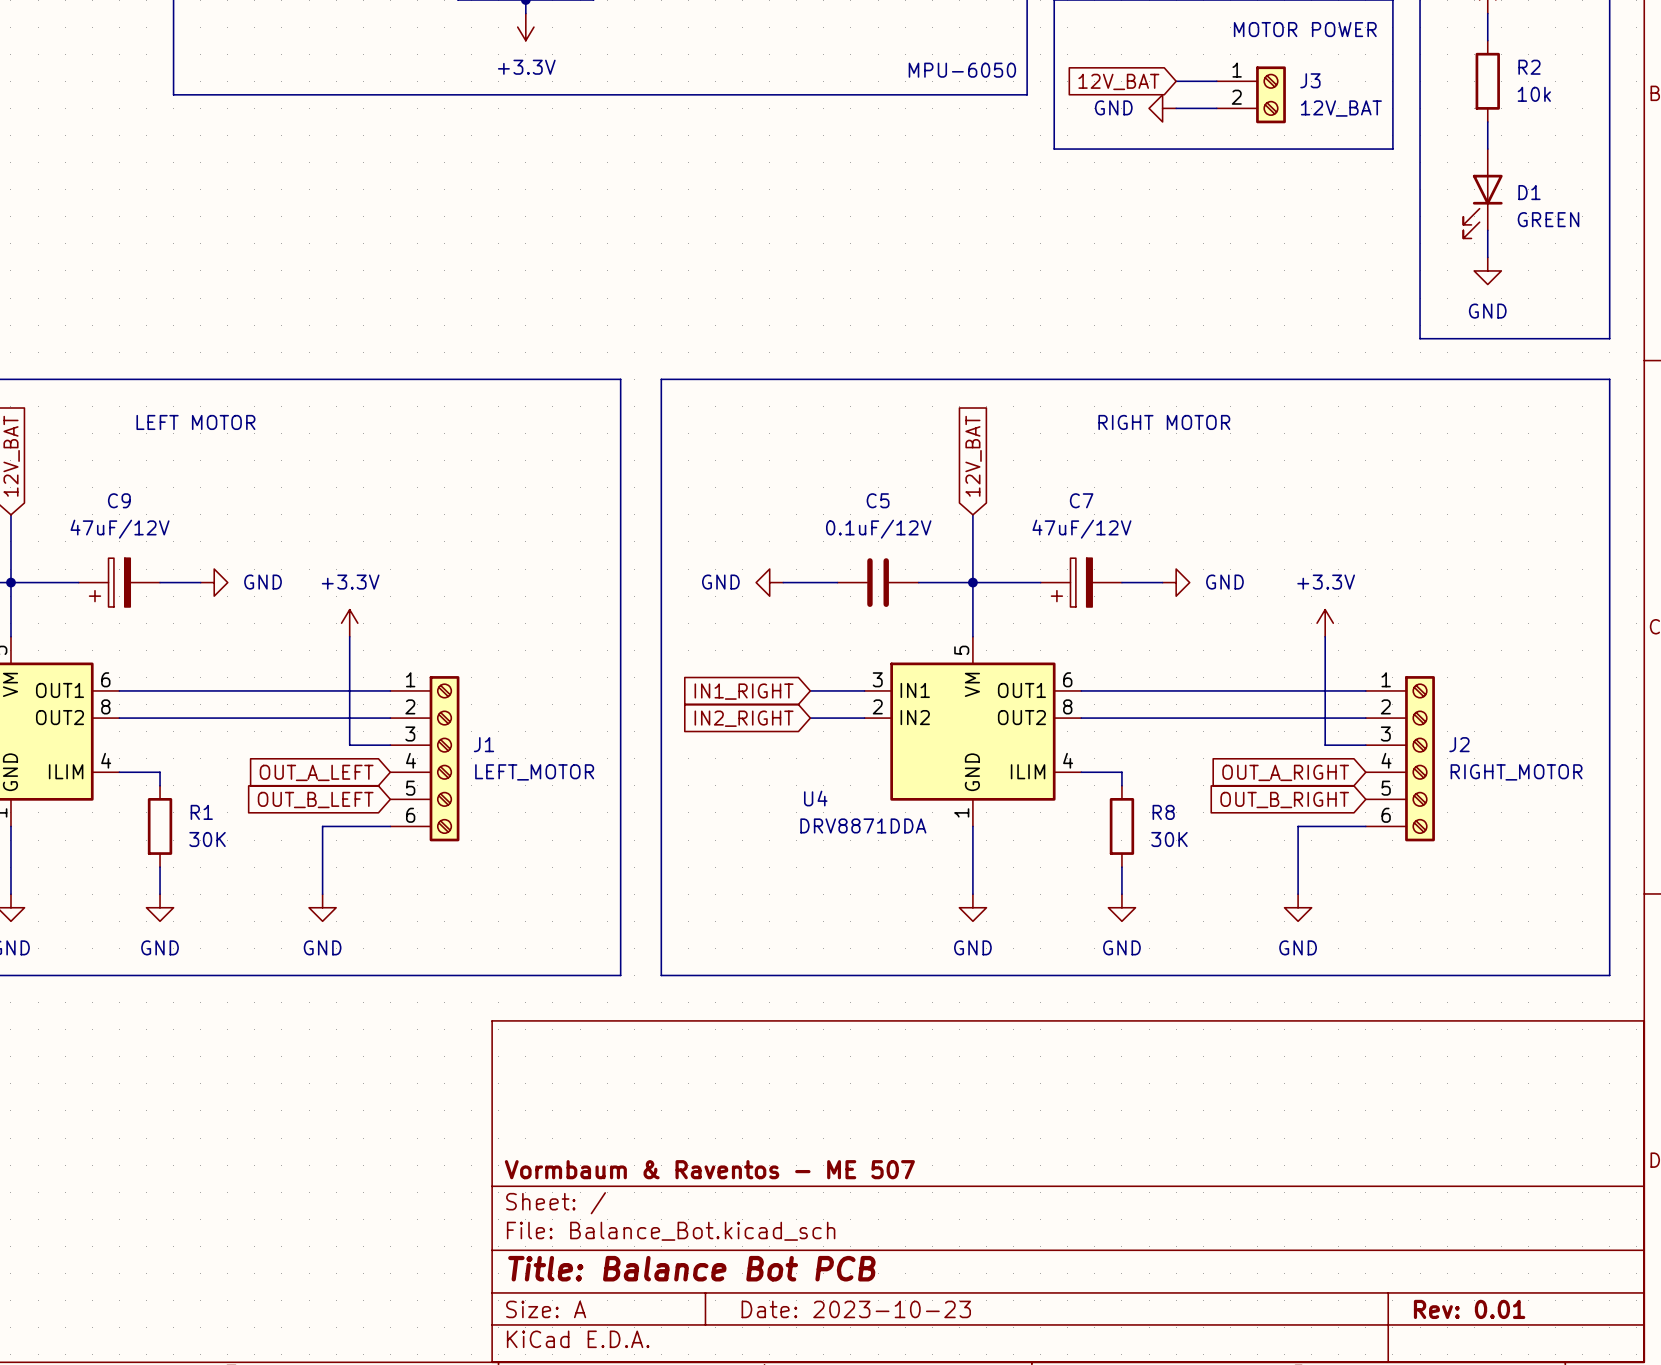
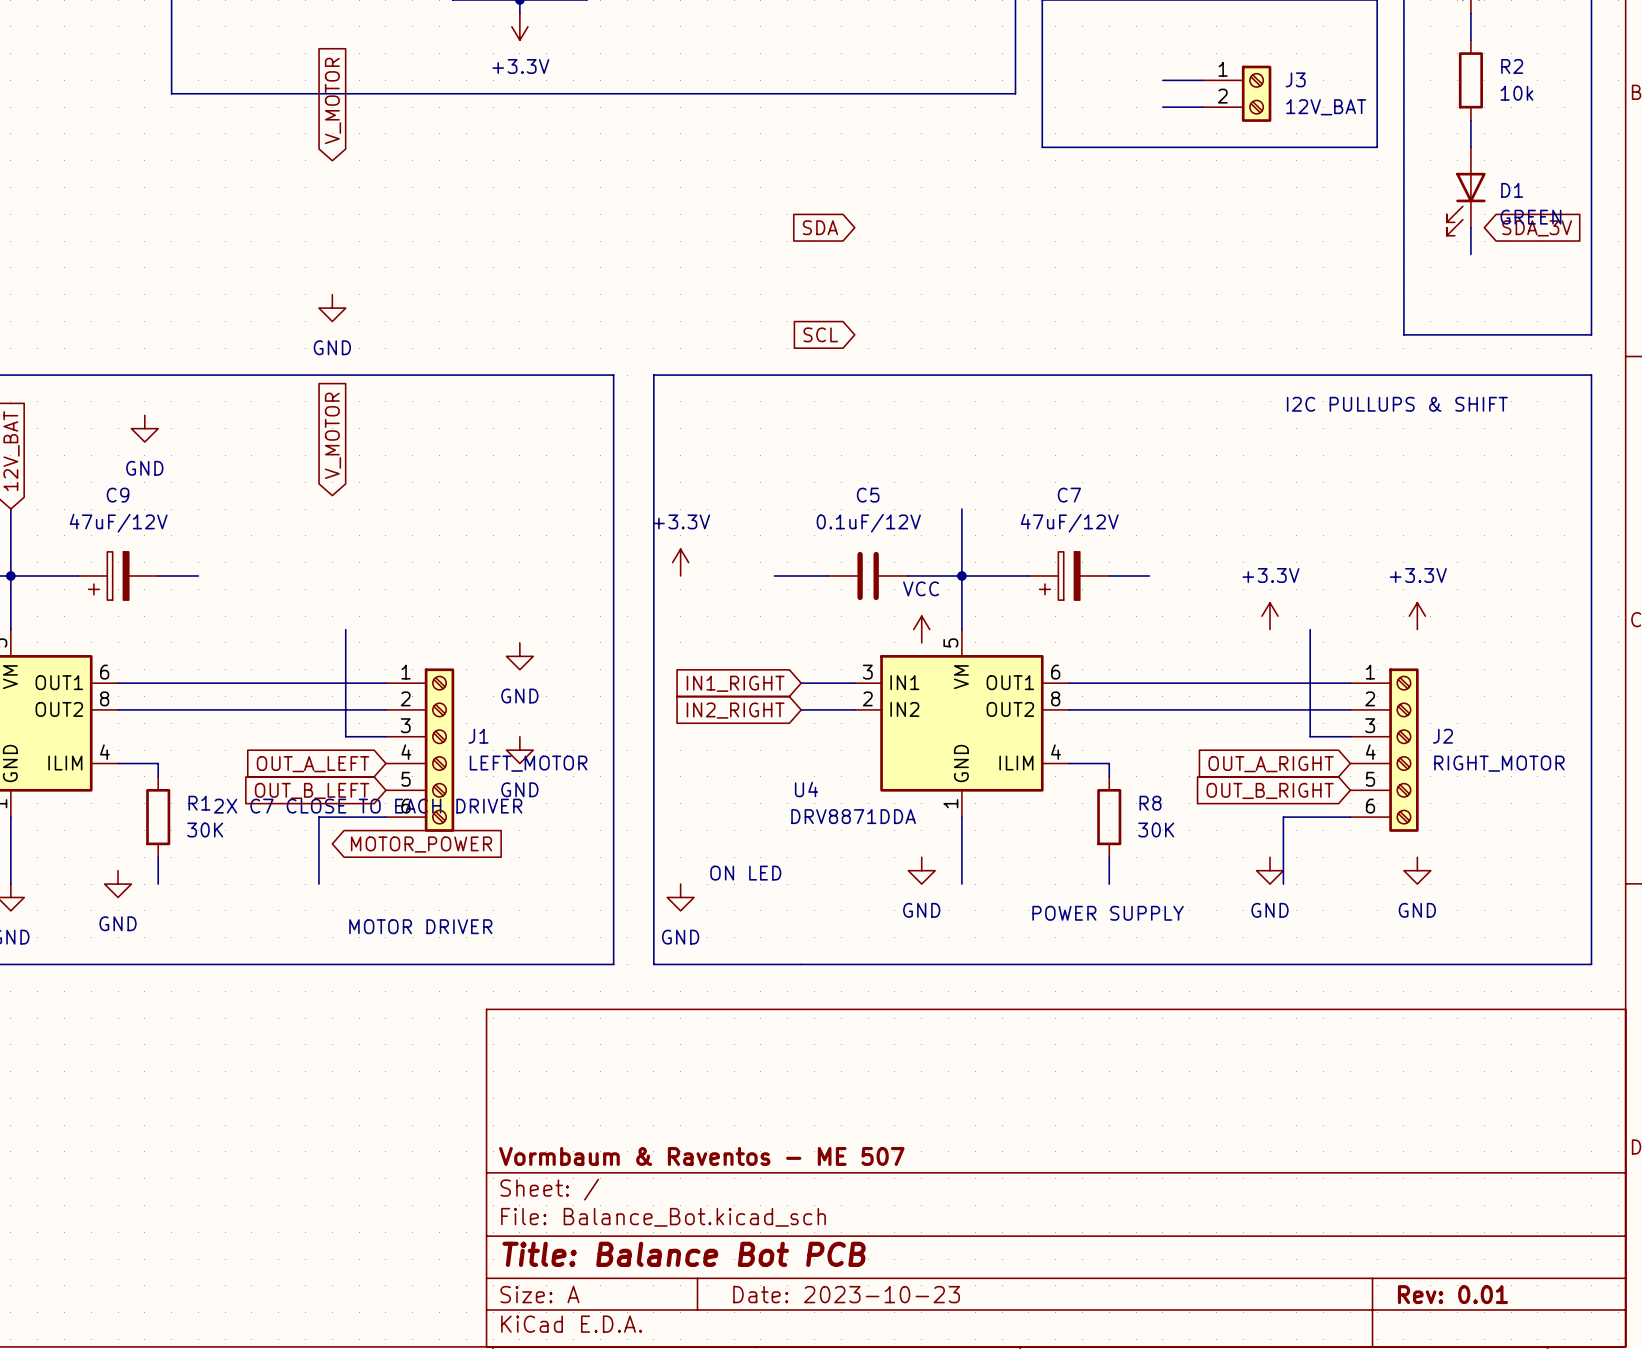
text: MOTOR POWER (1305, 29) -> none
text: MPU-6050 (962, 70) -> none
global label: 12V_BAT (1118, 81) -> none
global label: none -> V_MOTOR (332, 100)
power symbol: GND (1162, 108) -> none
global label: none -> SDA (820, 227)
global label: none -> SDA_3V (1537, 228)
power symbol: GND (1487, 270) -> none
power symbol: none -> GND (332, 308)
global label: none -> SCL (820, 334)
text: none -> I2C PULLUPS & SHIFT (1397, 404)
text: LEFT MOTOR (195, 422) -> none
text: RIGHT MOTOR (1164, 422) -> none
power symbol: none -> GND (144, 428)
global label: none -> V_MOTOR (332, 435)
global label: 12V_BAT (973, 456) -> none
power symbol: none -> +3.3V (680, 562)
power symbol: GND (214, 582) -> none
power symbol: GND (769, 582) -> none
power symbol: GND (1176, 582) -> none
power symbol: +3.3V (349, 623) -> none
power symbol position: +3.3V (1325, 623) -> +3.3V (1270, 616)
power symbol: none -> +3.3V (1417, 616)
power symbol: none -> VCC (921, 629)
power symbol: none -> GND (519, 656)
power symbol: none -> GND (519, 750)
text: none -> 2X C7 CLOSE TO EACH DRIVER (368, 806)
global label: none -> MOTOR_POWER (421, 844)
power symbol: none -> GND (1417, 870)
text: none -> ON LED (745, 873)
power symbol position: GND (160, 907) -> GND (118, 884)
power symbol: GND (322, 907) -> none
power symbol: none -> GND (680, 897)
power symbol position: GND (972, 907) -> GND (921, 870)
power symbol: GND (1121, 907) -> none
power symbol position: GND (1298, 907) -> GND (1270, 870)
text: none -> POWER SUPPLY (1108, 913)
text: none -> MOTOR DRIVER (420, 926)

